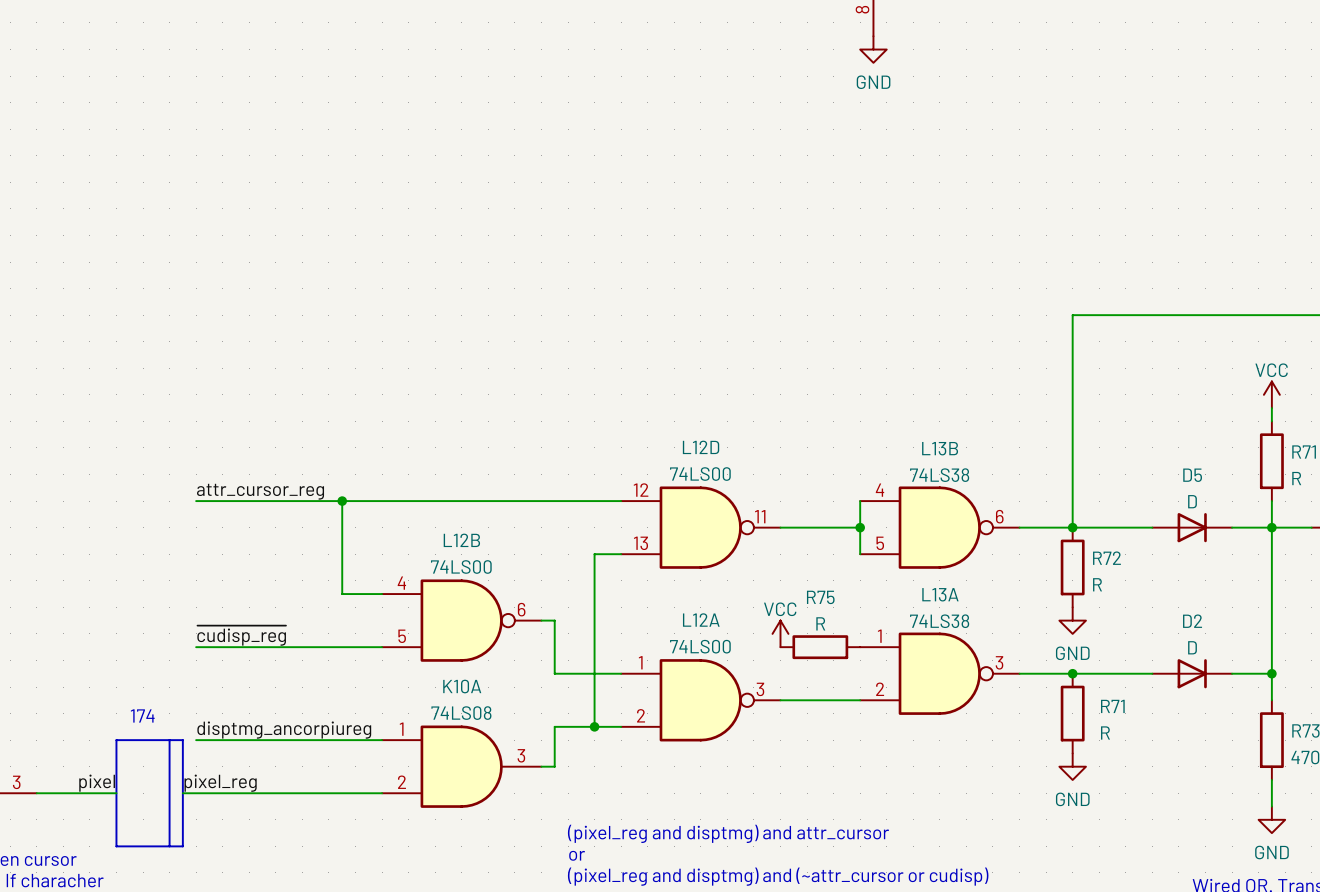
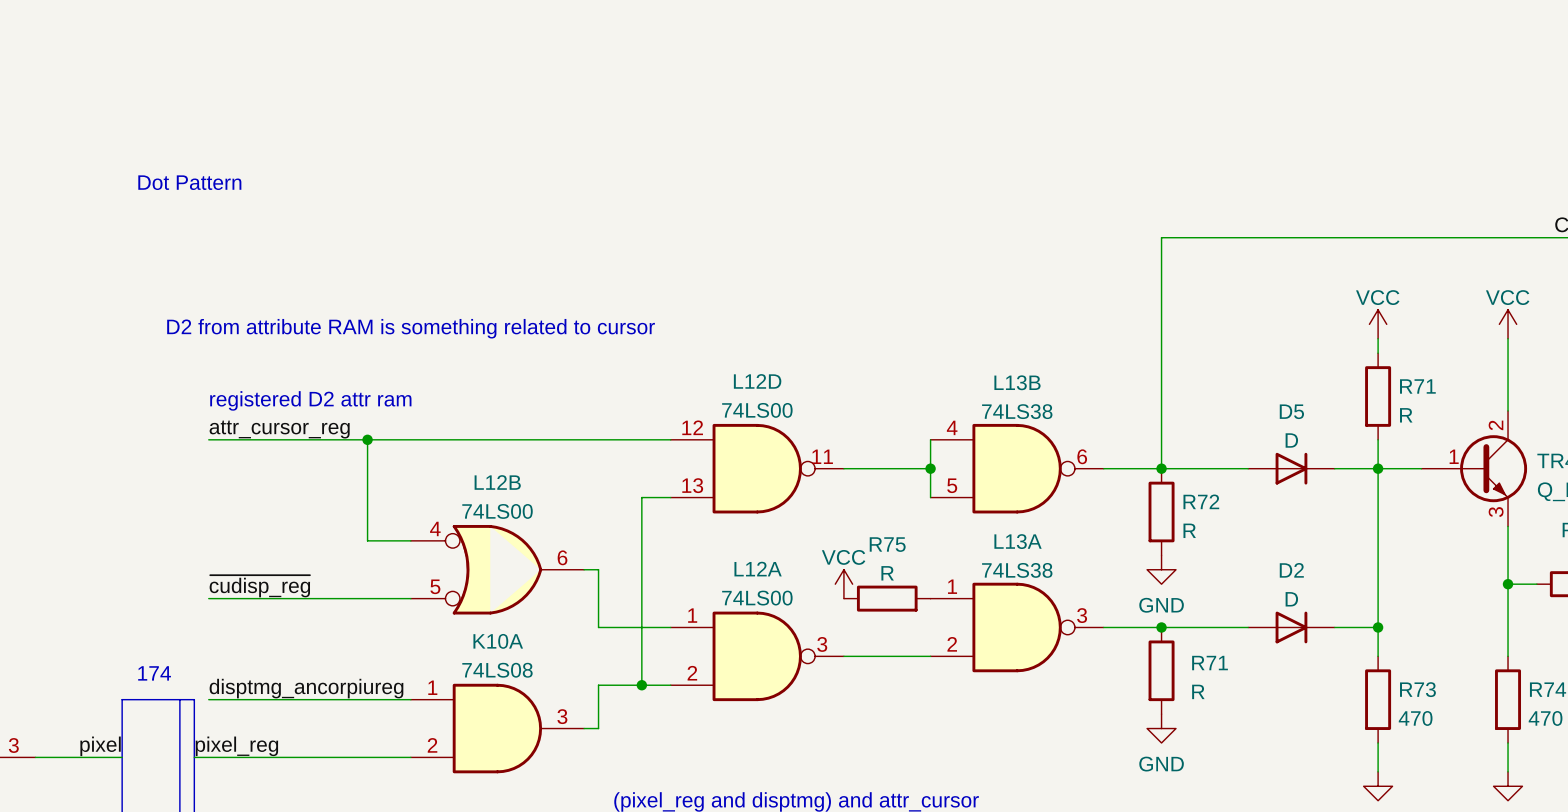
text: none -> Dot Pattern (189, 182)
text: none -> D2 from attribute RAM is something related to cursor (411, 328)
text: none -> registered D2 attr ram (310, 400)
L12B symbol: [382, 579, 542, 662] -> [410, 524, 585, 615]

